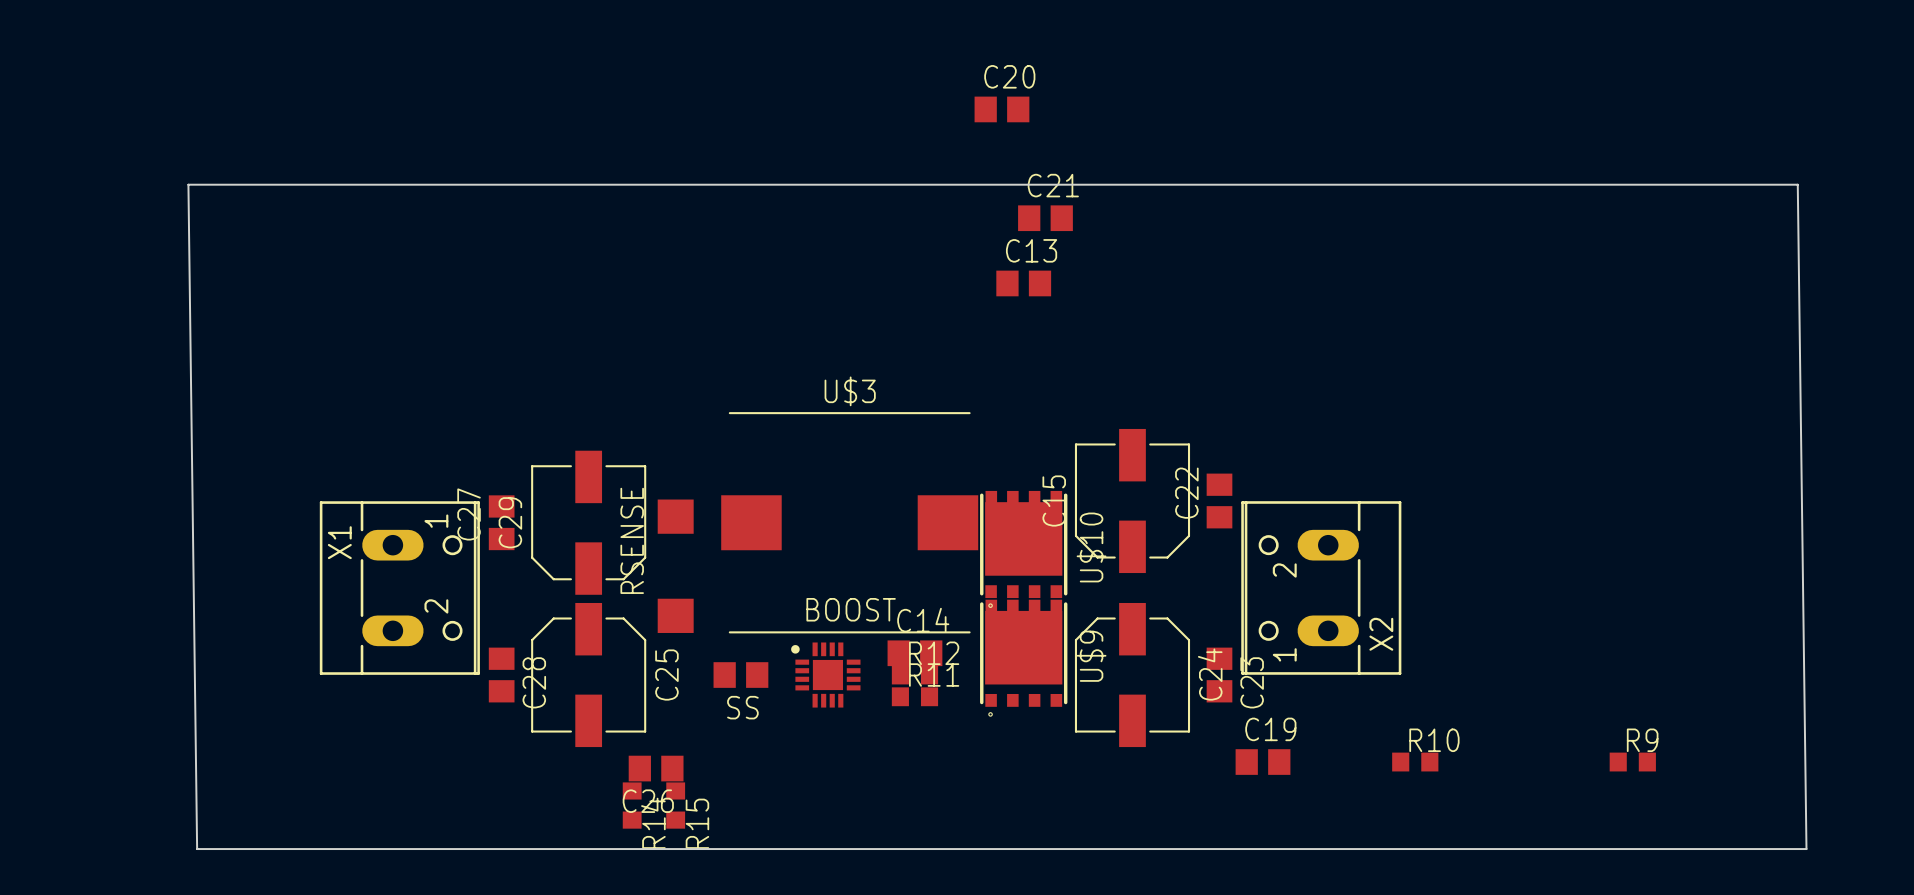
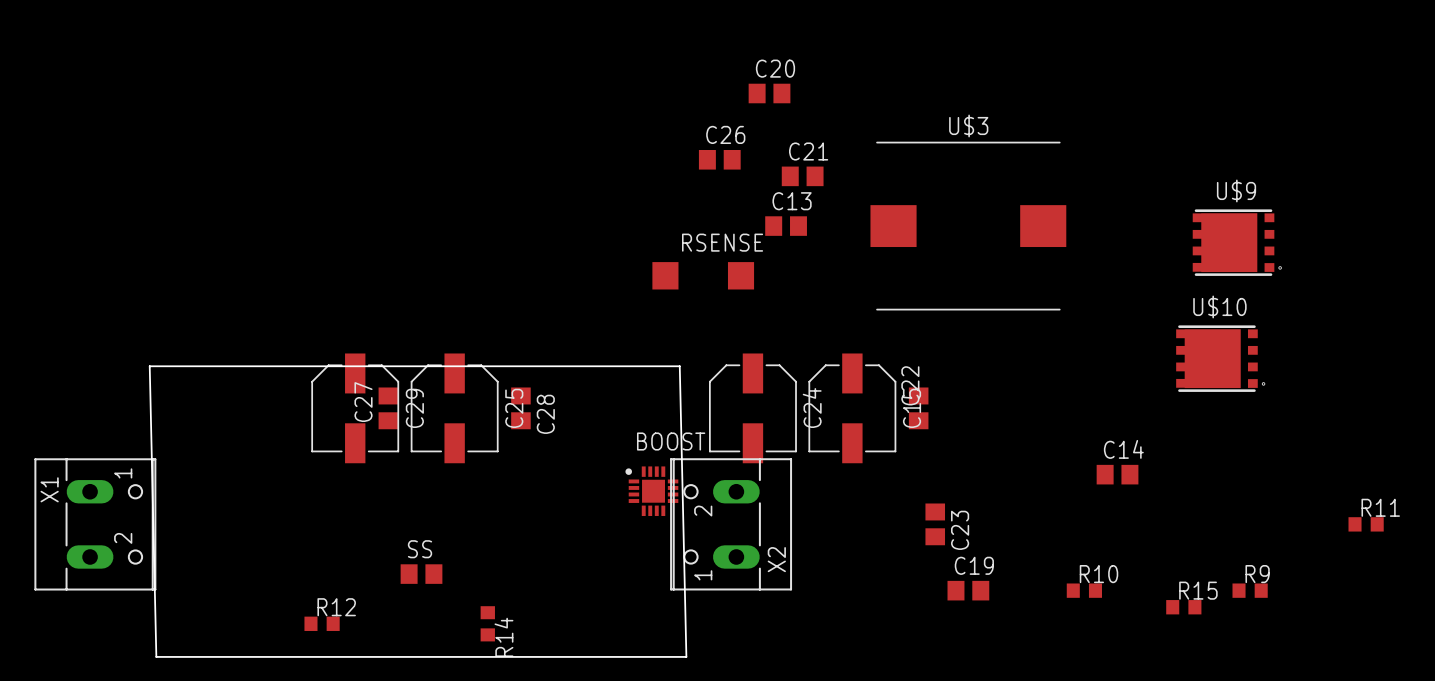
C15 rotation: 0° (1132, 500) -> 180° (852, 408)
C22 position: (1219, 500) -> (918, 408)
C29 rotation: 0° (588, 522) -> 180° (355, 408)
C29 position: (588, 522) -> (355, 408)
U$3 position: (849, 522) -> (968, 226)
U$10 rotation: 0° (1023, 549) -> 90° counterclockwise (1220, 358)
U$10 position: (1023, 549) -> (1220, 358)
RSENSE rotation: 0° (675, 566) -> 90° clockwise (703, 275)
RSENSE position: (675, 566) -> (703, 275)
X2 position: (1321, 587) -> (731, 524)
X1 position: (399, 588) -> (95, 524)
C14 position: (914, 653) -> (1117, 474)
U$9 rotation: 0° (1023, 658) -> 90° counterclockwise (1237, 242)
U$9 position: (1023, 658) -> (1237, 242)
C28 position: (501, 675) -> (520, 408)
C25 position: (588, 675) -> (454, 408)
SS position: (740, 675) -> (421, 574)
BOOST position: (825, 675) -> (651, 491)
R12 position: (914, 675) -> (322, 623)
C24 position: (1132, 675) -> (752, 408)
R11 position: (914, 696) -> (1366, 524)
SS name position: SS (742, 707) -> SS (420, 549)
C26 position: (656, 768) -> (719, 159)
C26 name position: C26 (648, 801) -> C26 (725, 134)
R15 rotation: 0° (675, 805) -> 90° clockwise (1183, 607)
R15 position: (675, 805) -> (1183, 607)
R15 name position: R15 (697, 823) -> R15 (1198, 590)
board edge: (197, 849) (188, 184) (1797, 184) (1806, 849) (892, 849) -> (156, 656) (149, 366) (679, 366) (686, 656)

